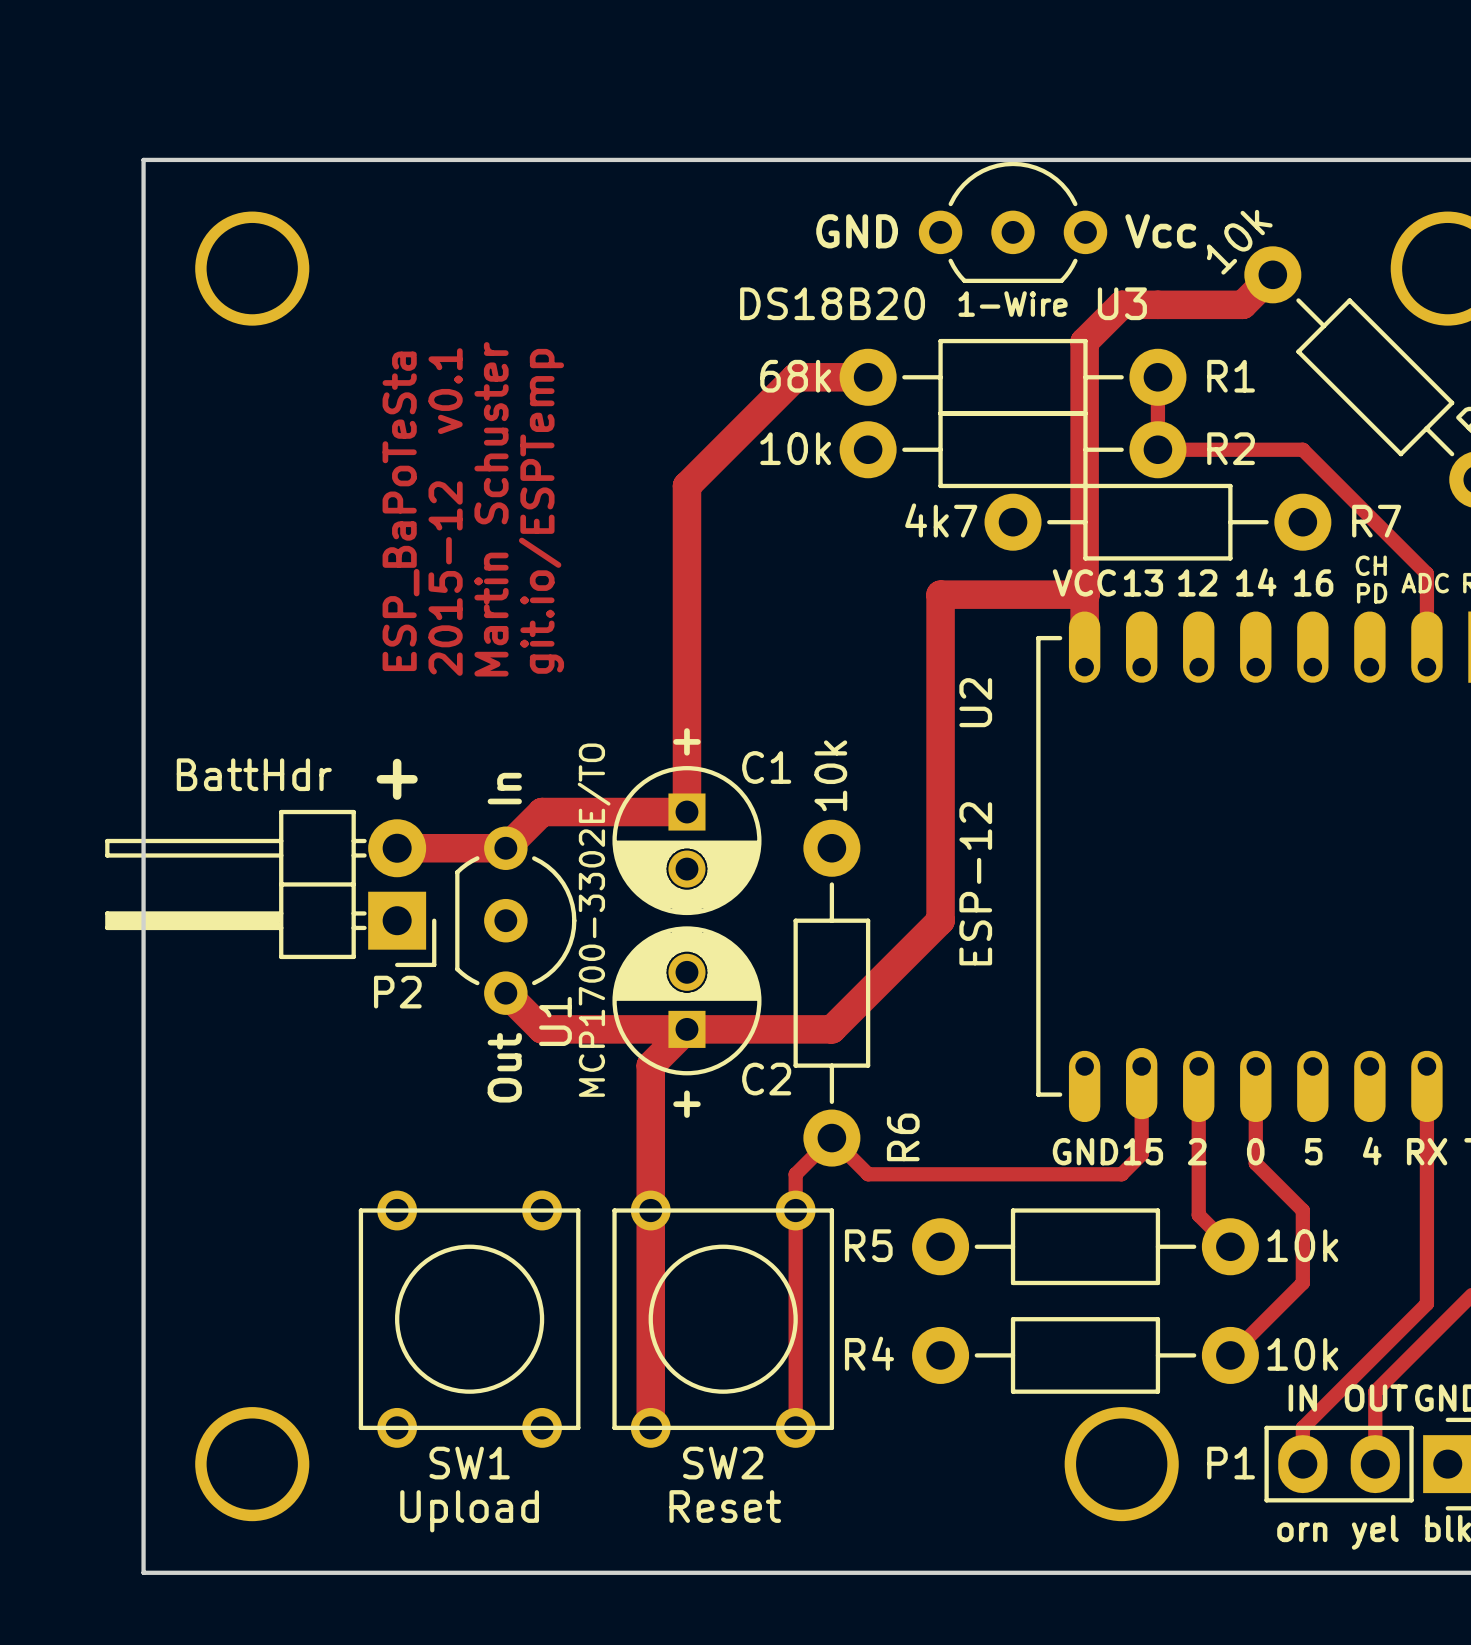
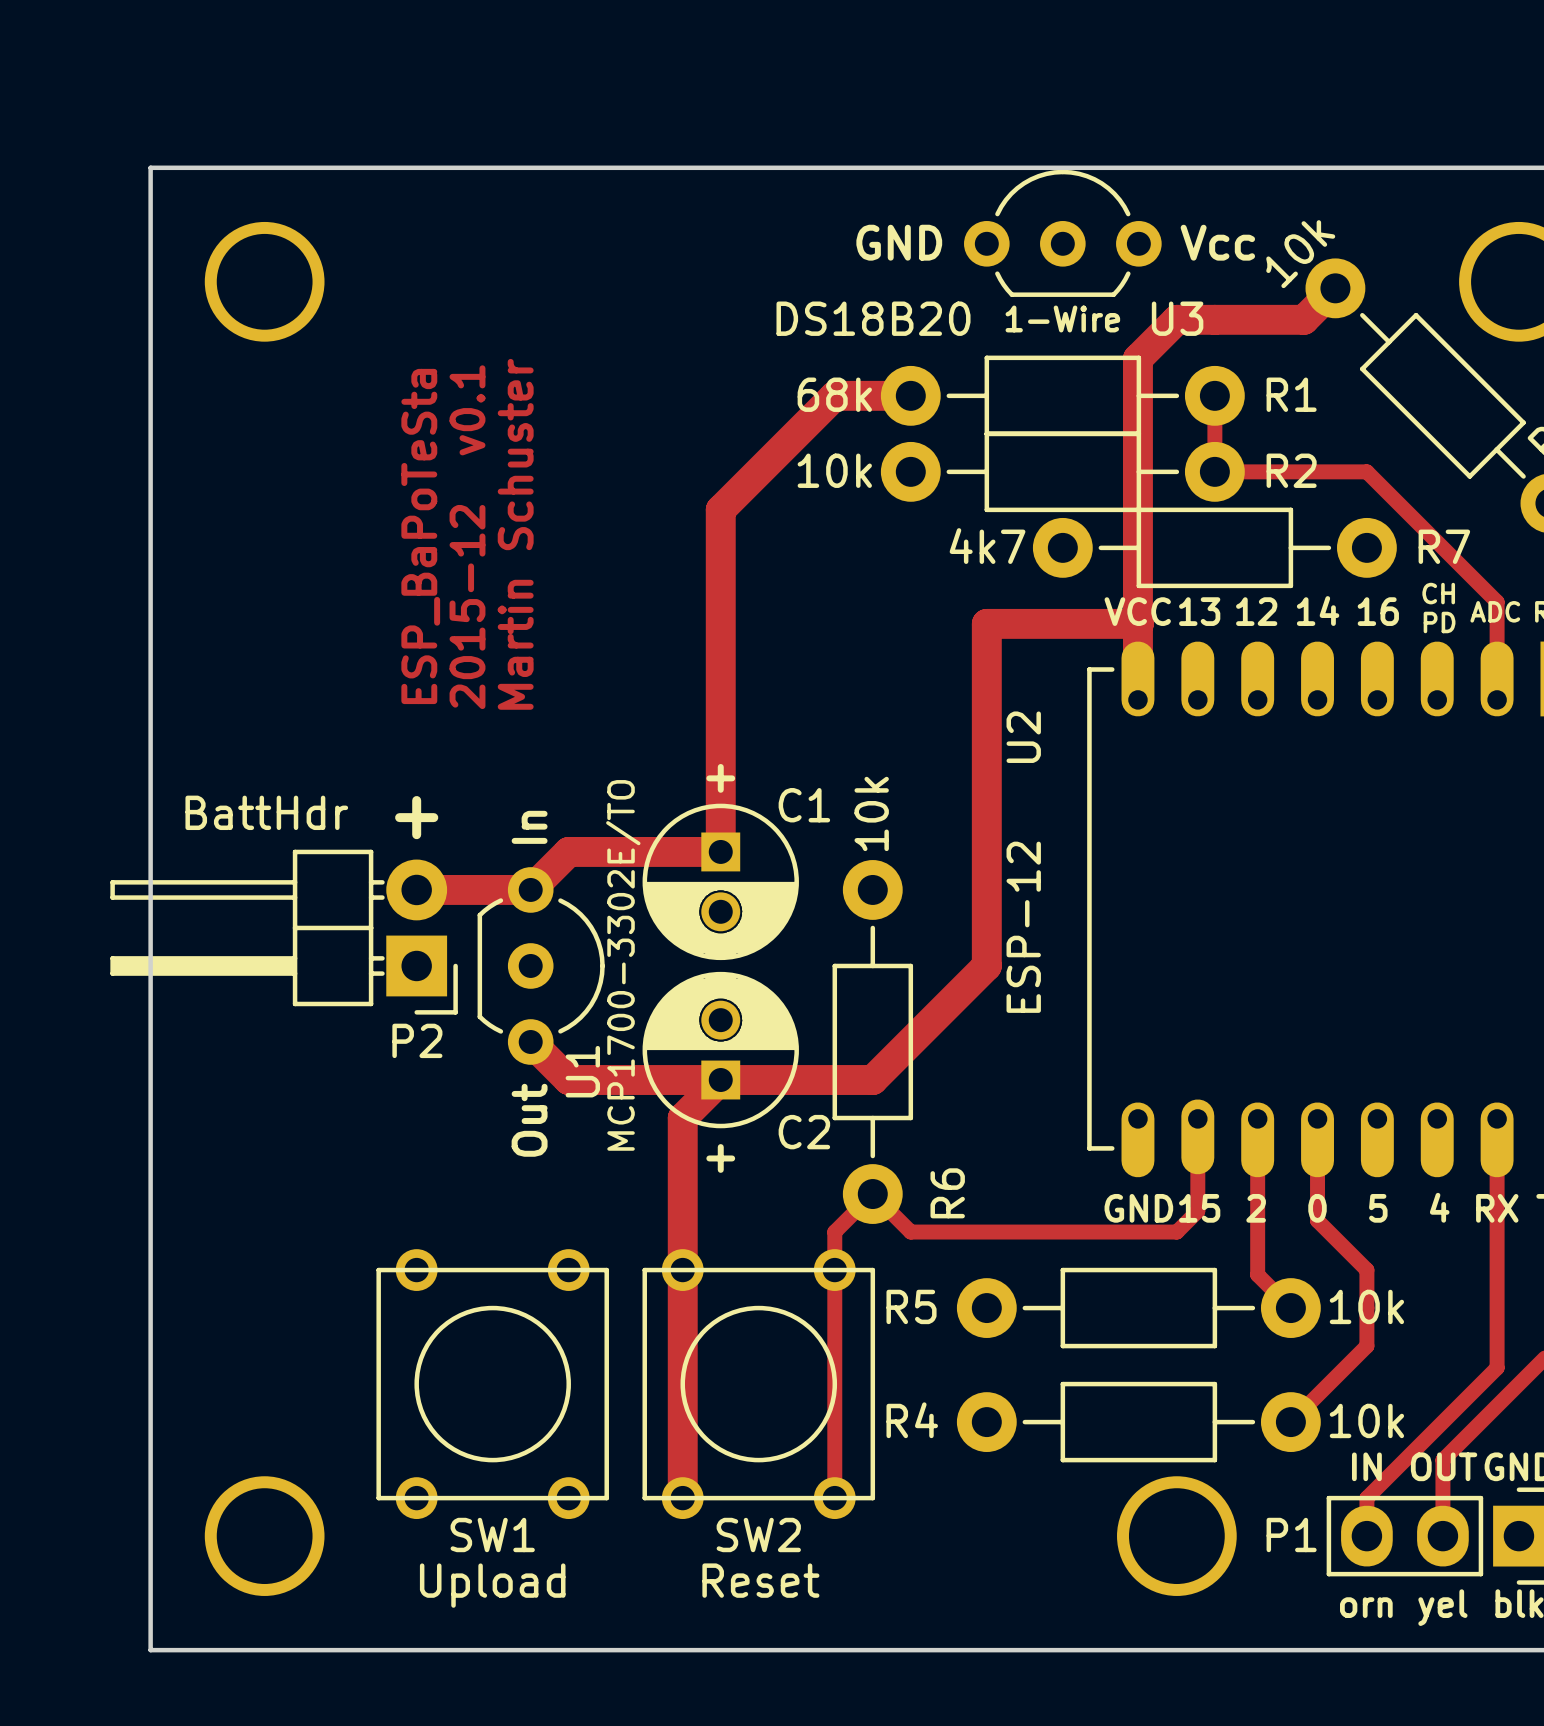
text: git.io/ESPTemp (541, 511) -> none

